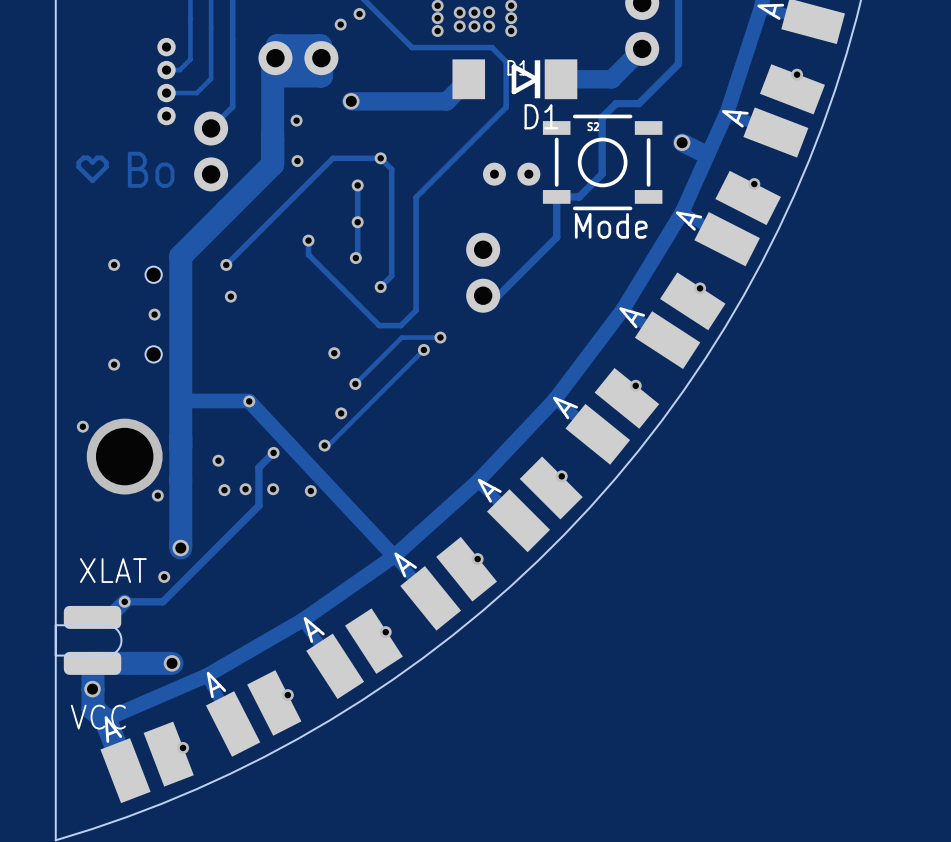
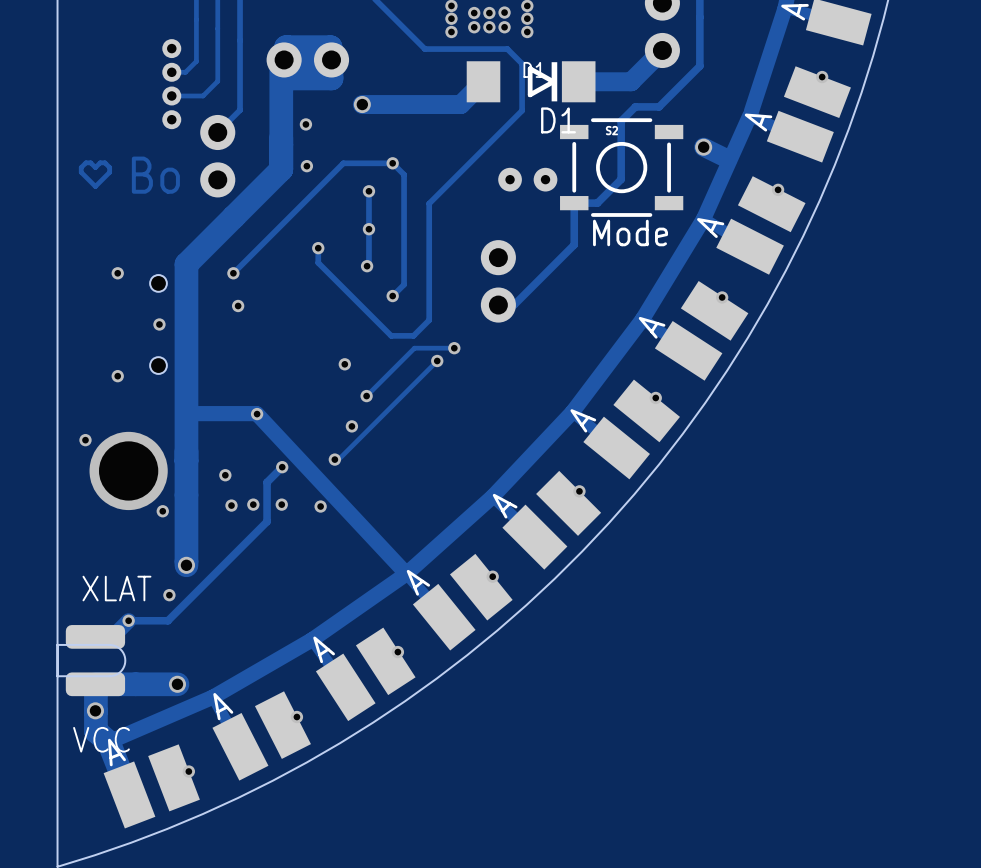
via: (359, 14) -> none
via: (340, 24) -> none

